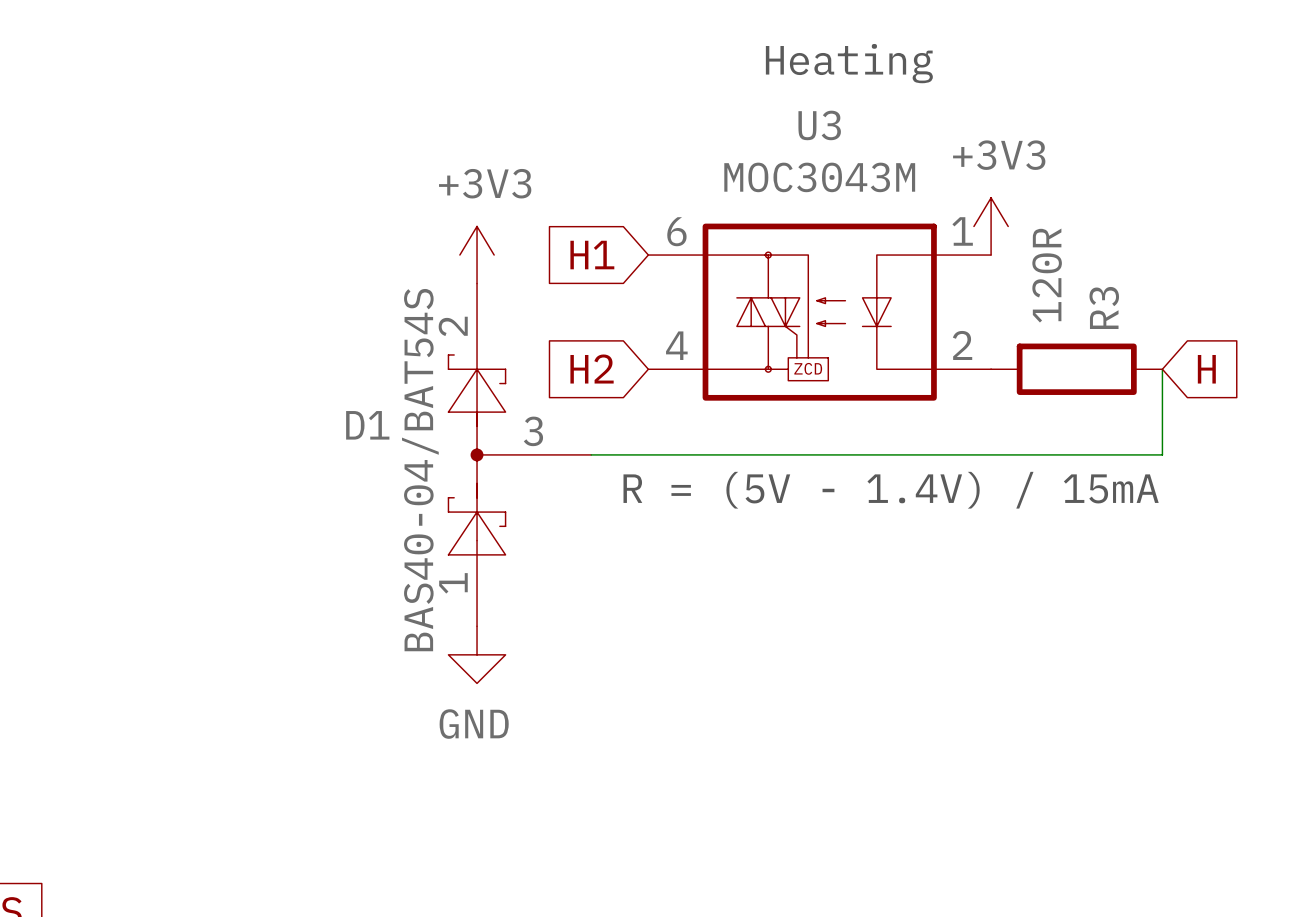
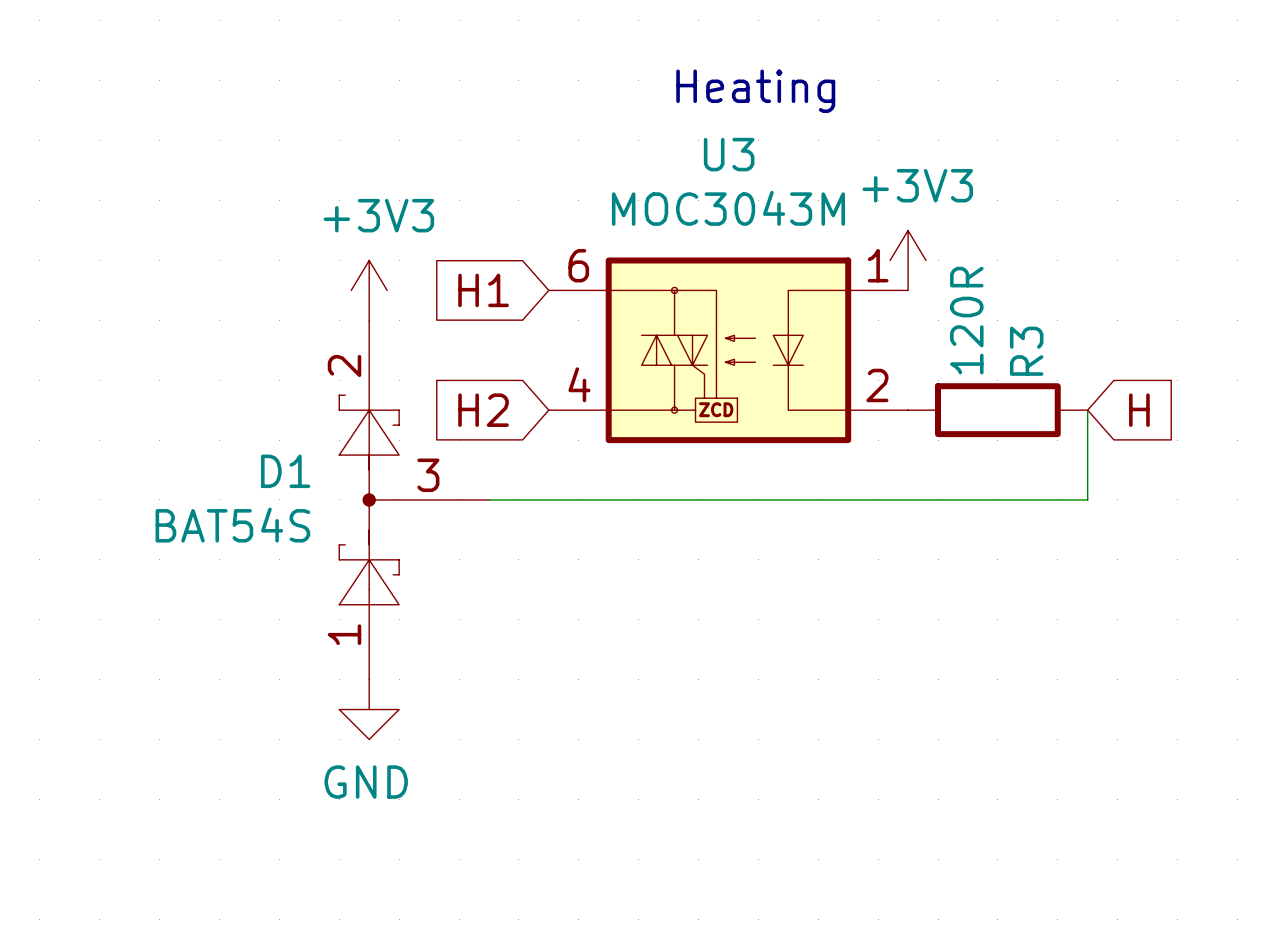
D1 name position: D1 (367, 425) -> D1 (285, 471)
D1 value: BAS40-04/BAT54S (420, 470) -> BAT54S (232, 525)
text: R = (5V - 1.4V) / 15mA (891, 490) -> none

